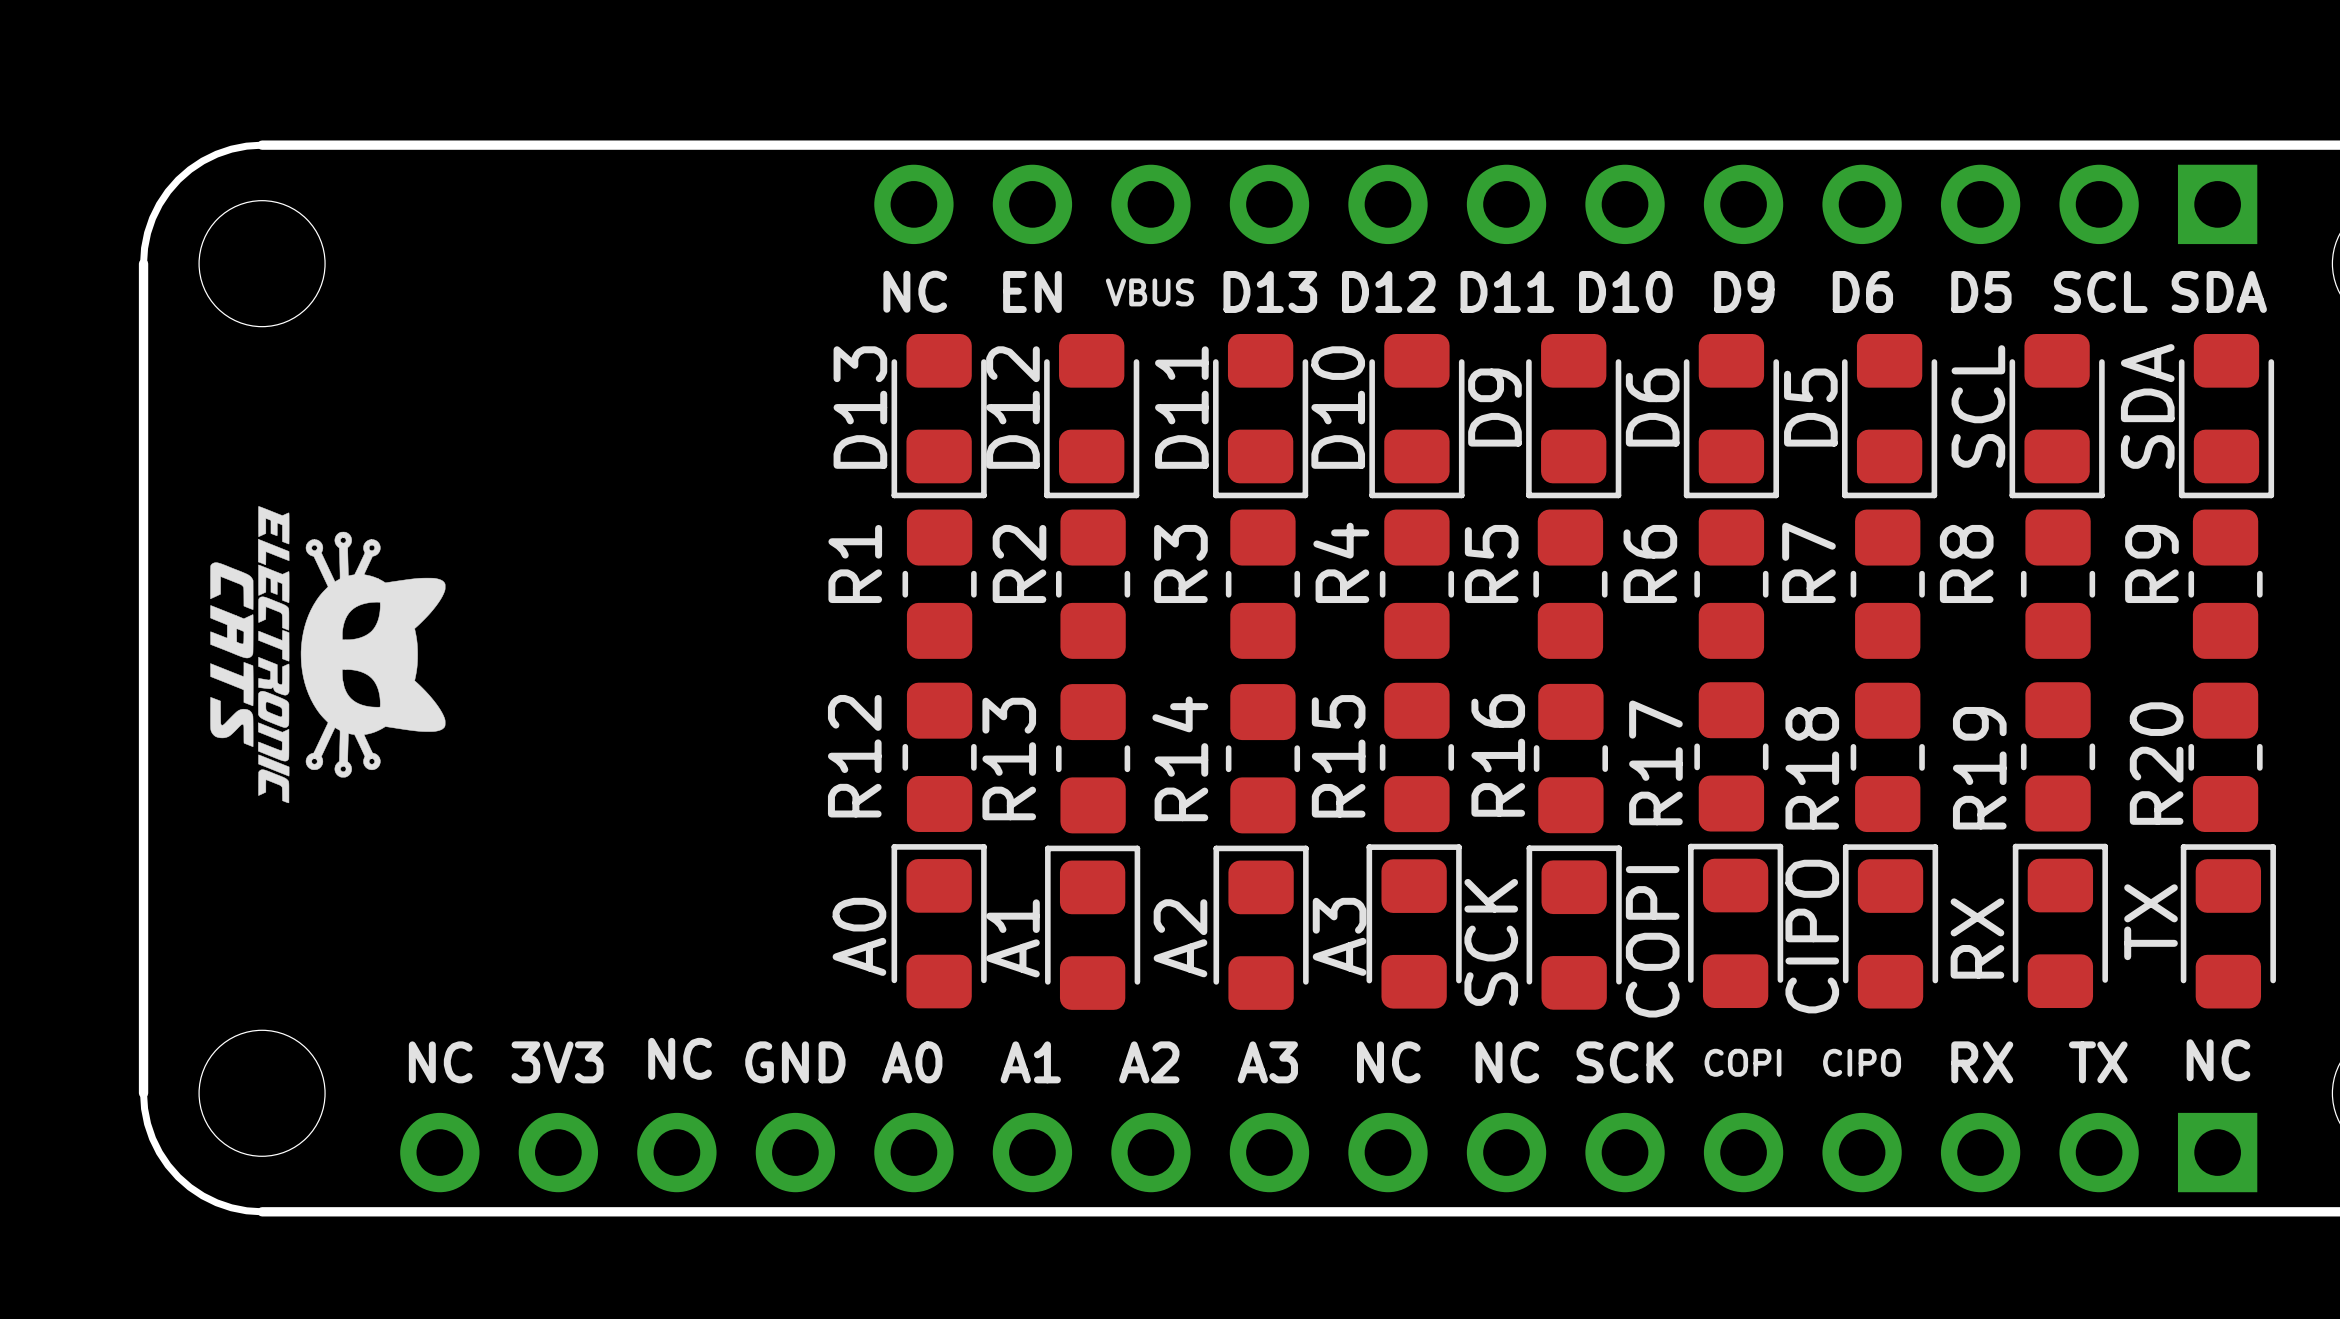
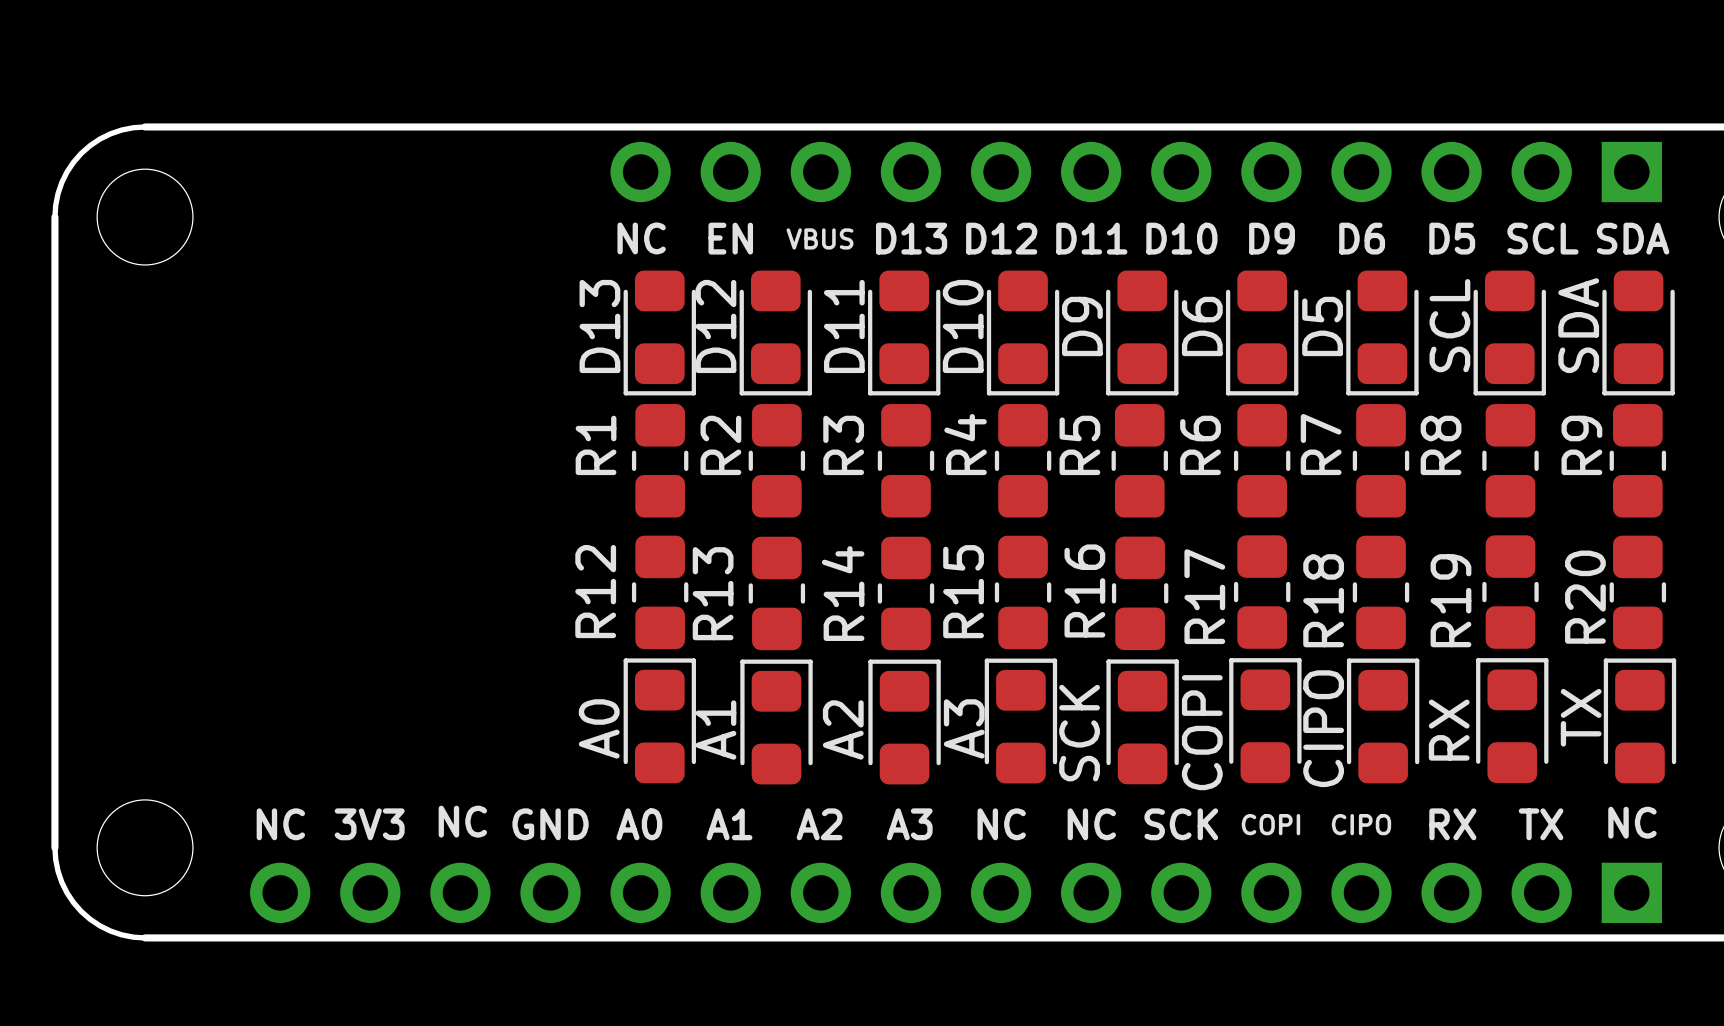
drawing: [210, 506, 446, 804] -> none

